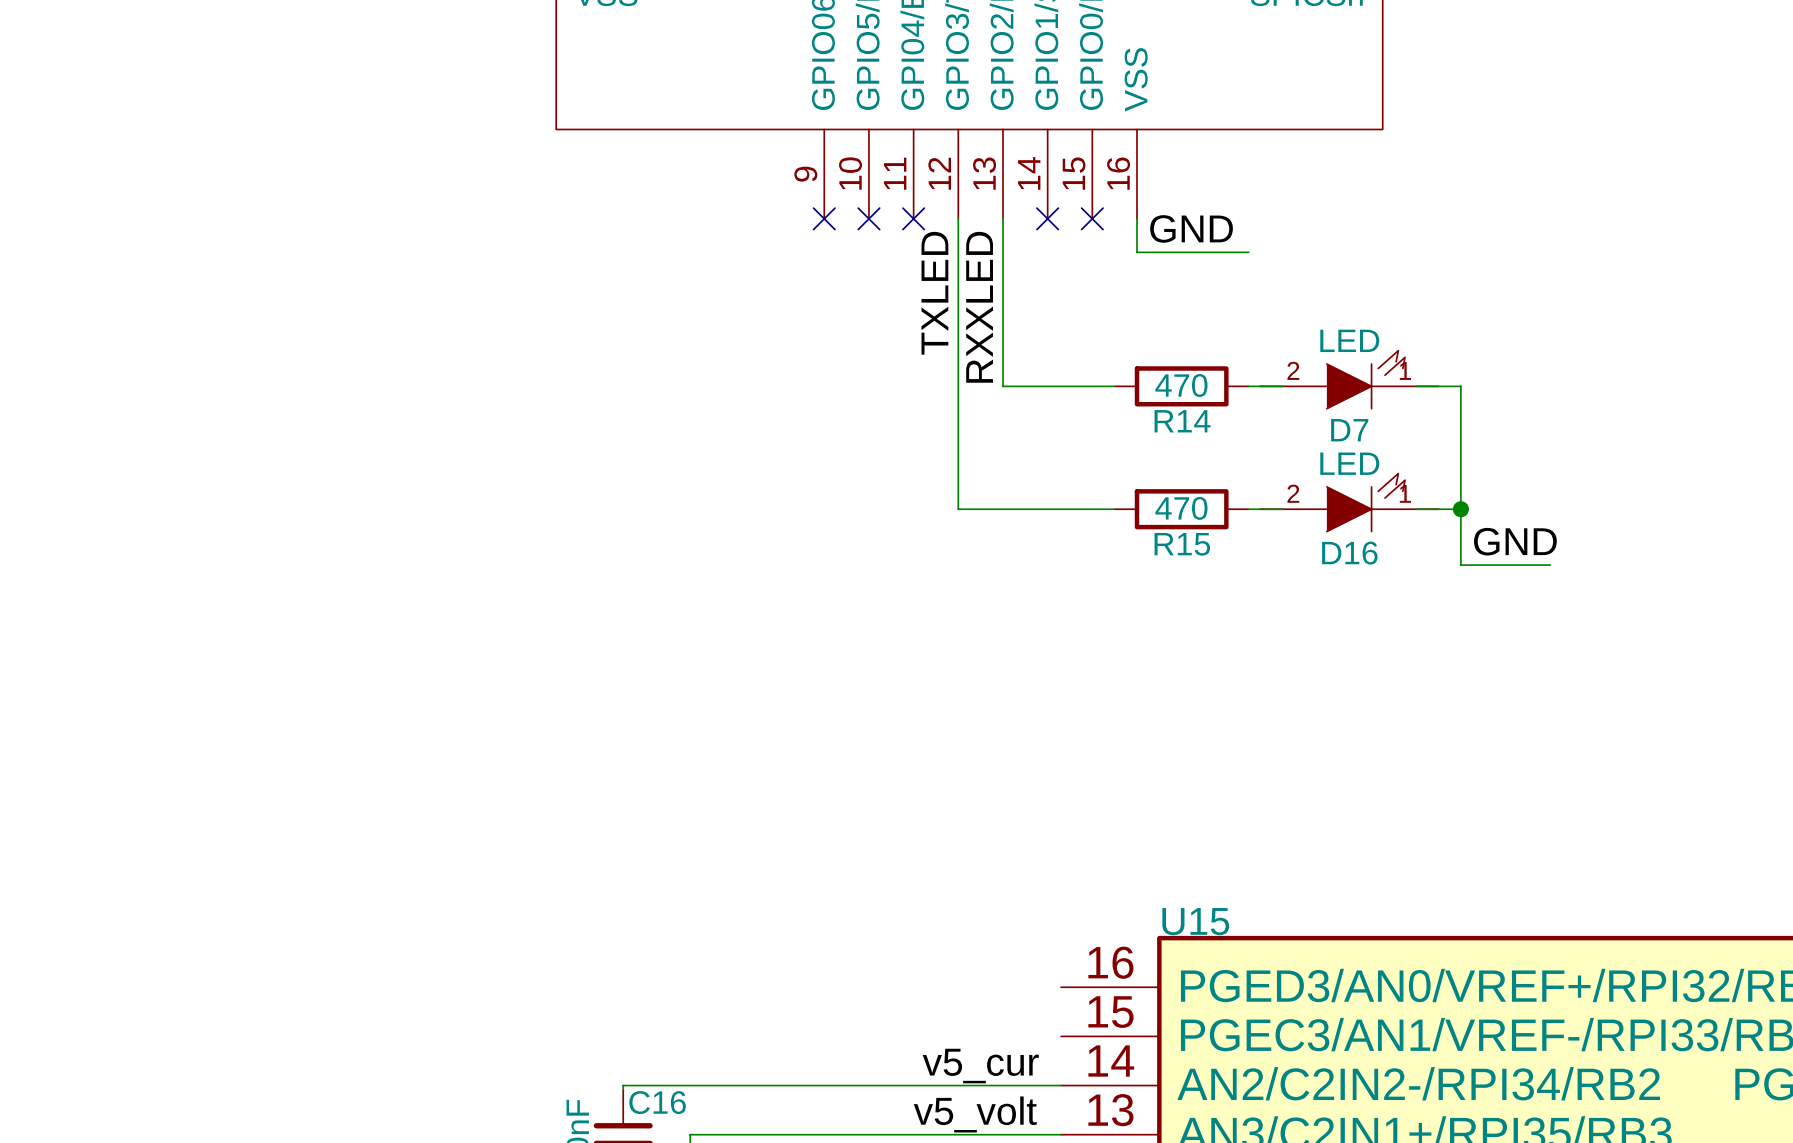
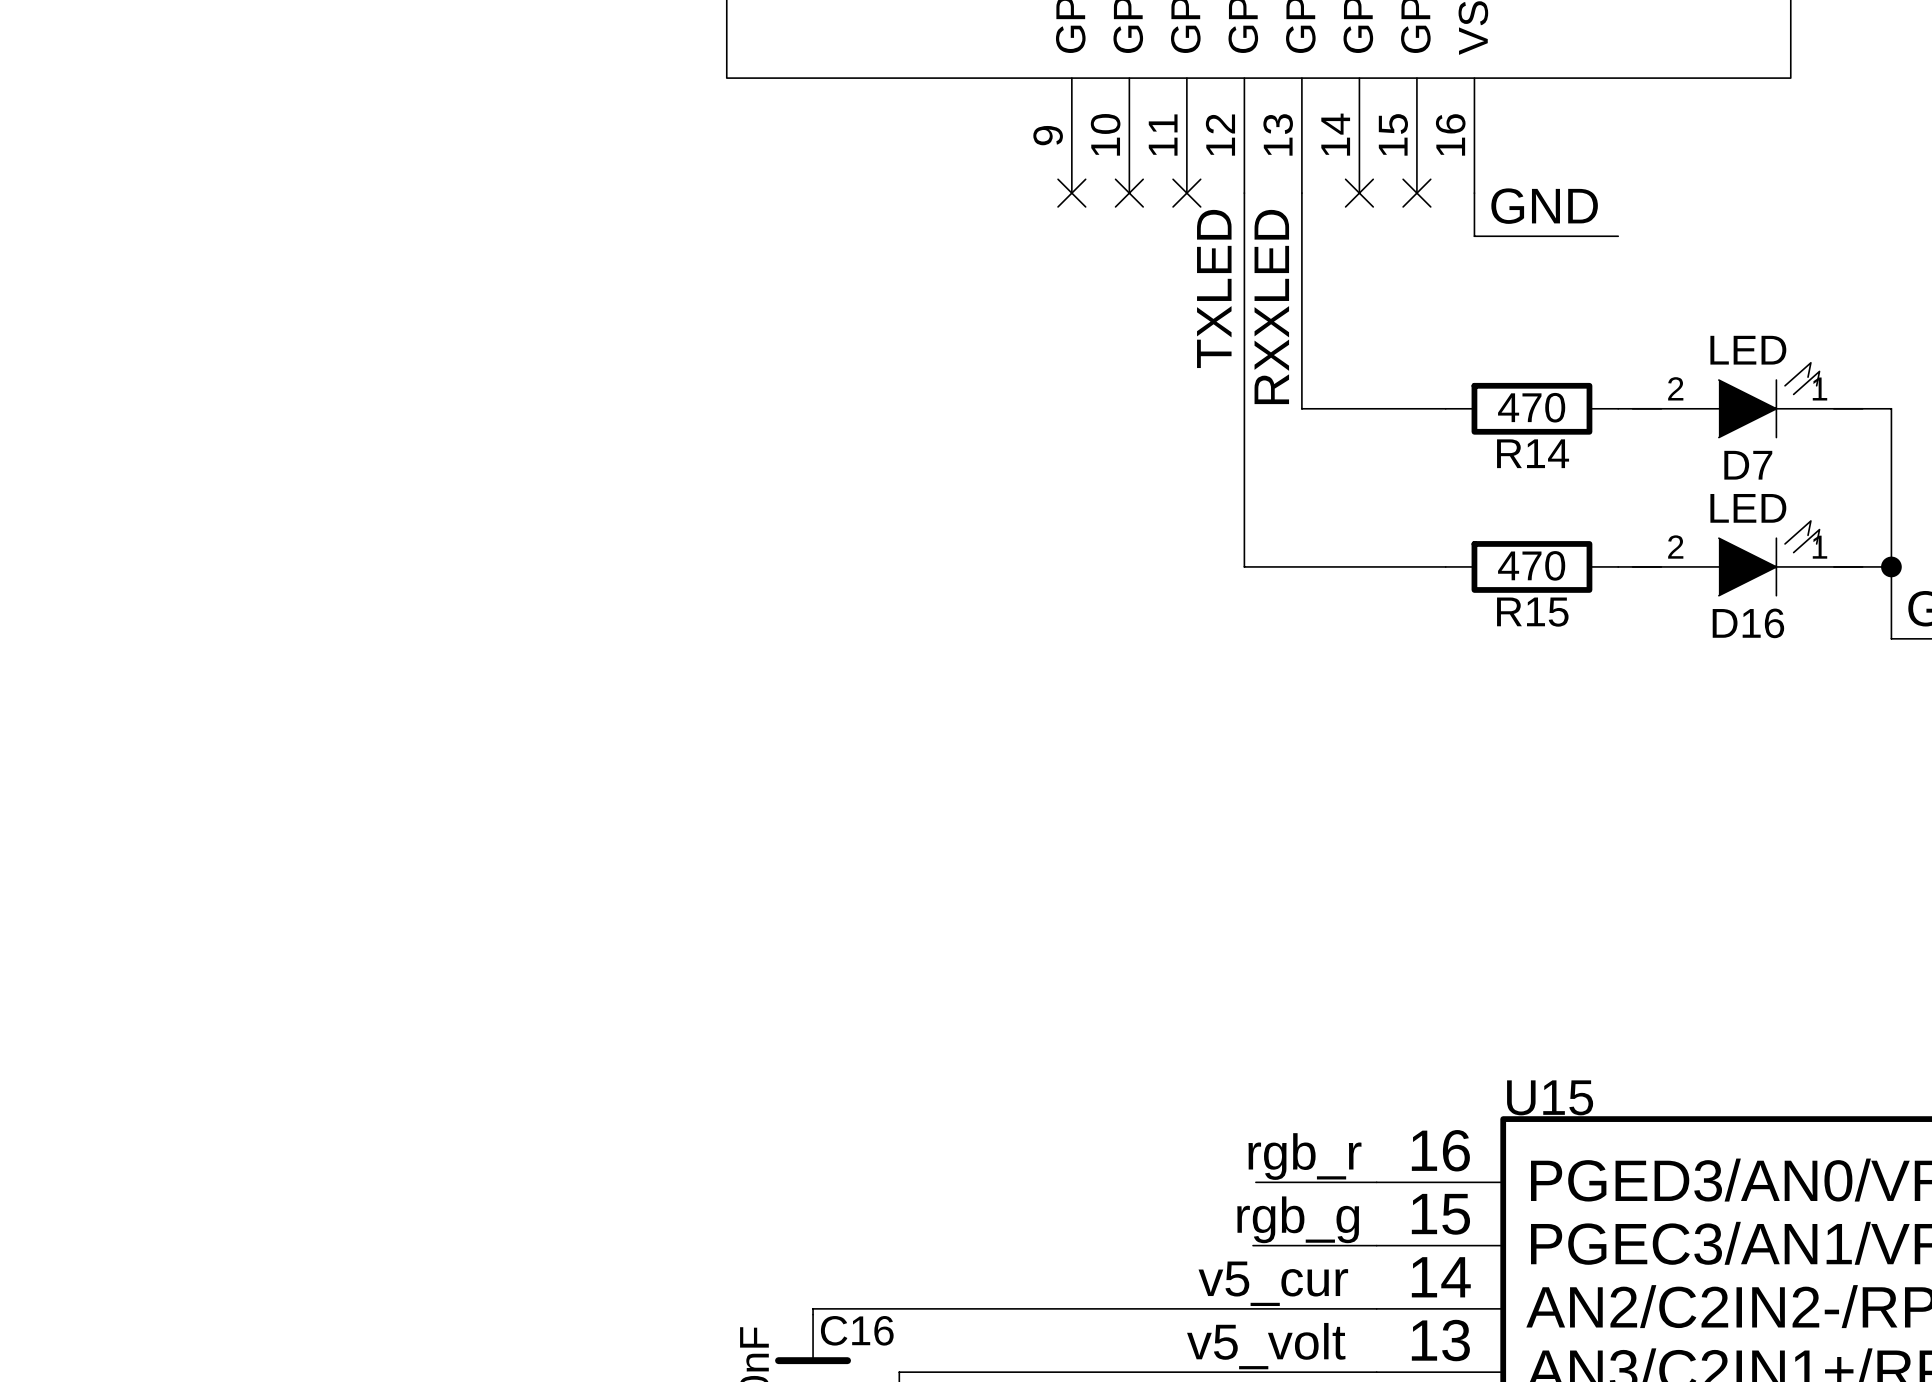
label: none -> rgb_r (1304, 1156)
wire: none -> (1255, 1182) (1376, 1182)
label: none -> rgb_g (1298, 1219)
wire: none -> (1253, 1245) (1376, 1245)

